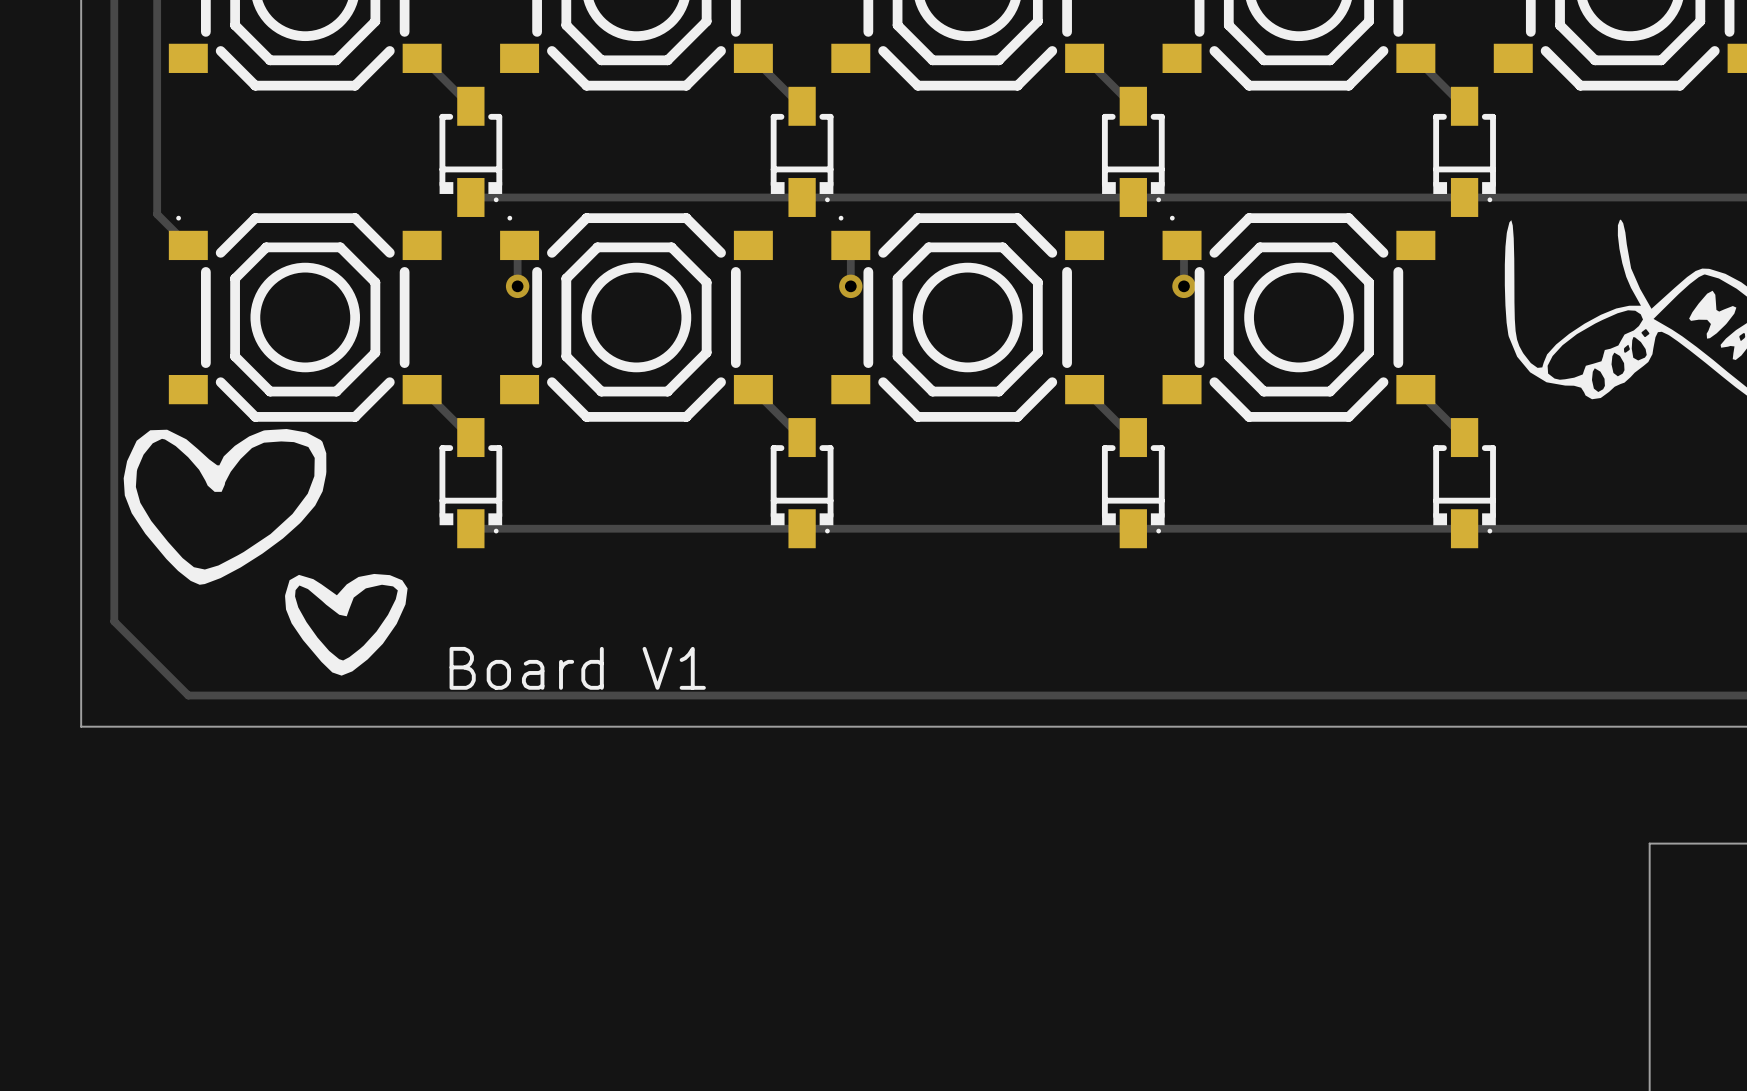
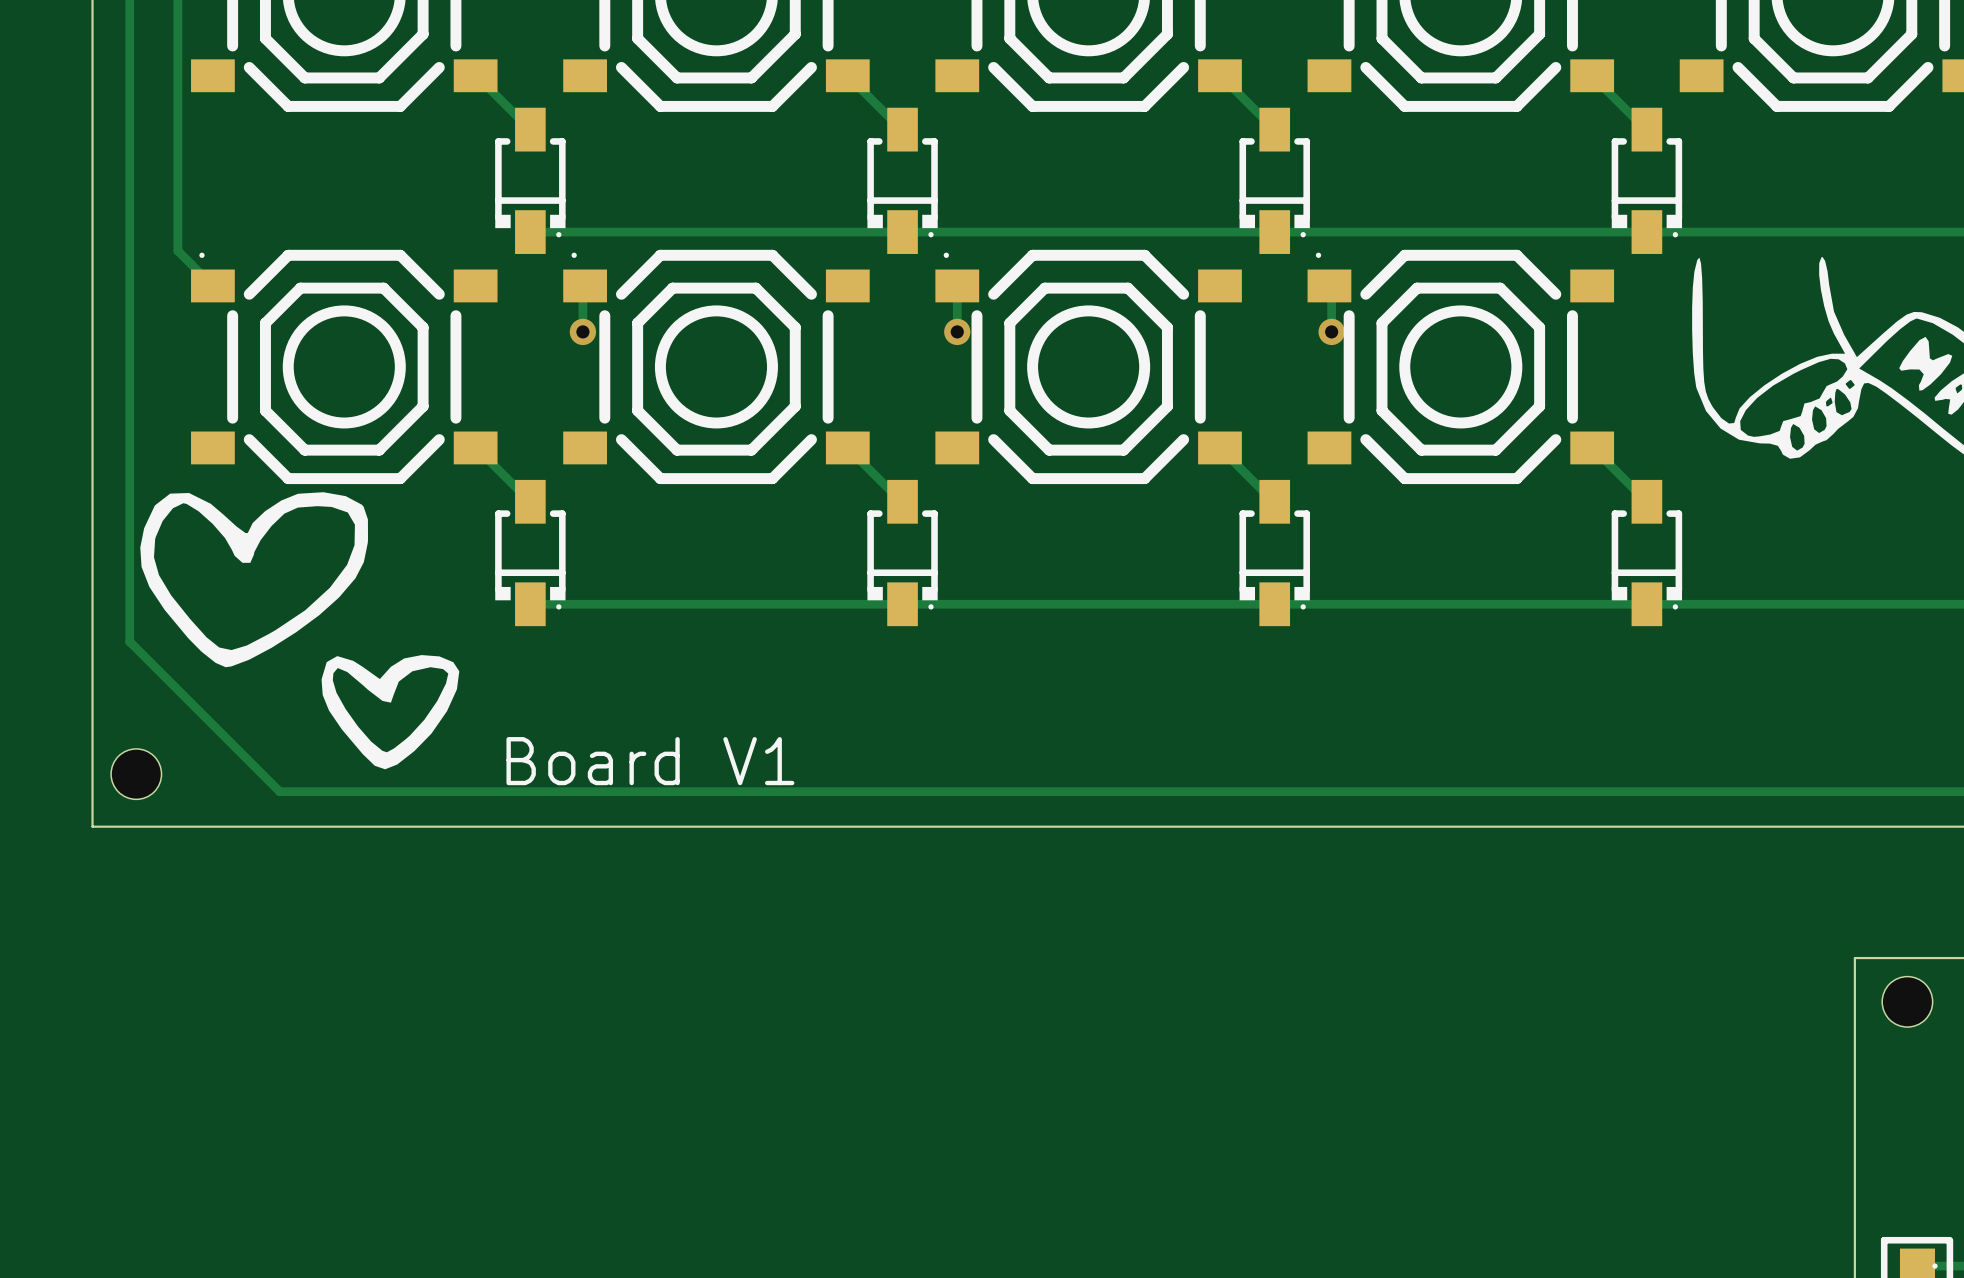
track: (114, 562) (114, 621) (188, 695) (247, 695) -> (129, 641) (279, 791)
part: none -> (136, 774)
part: none -> (1907, 1001)

